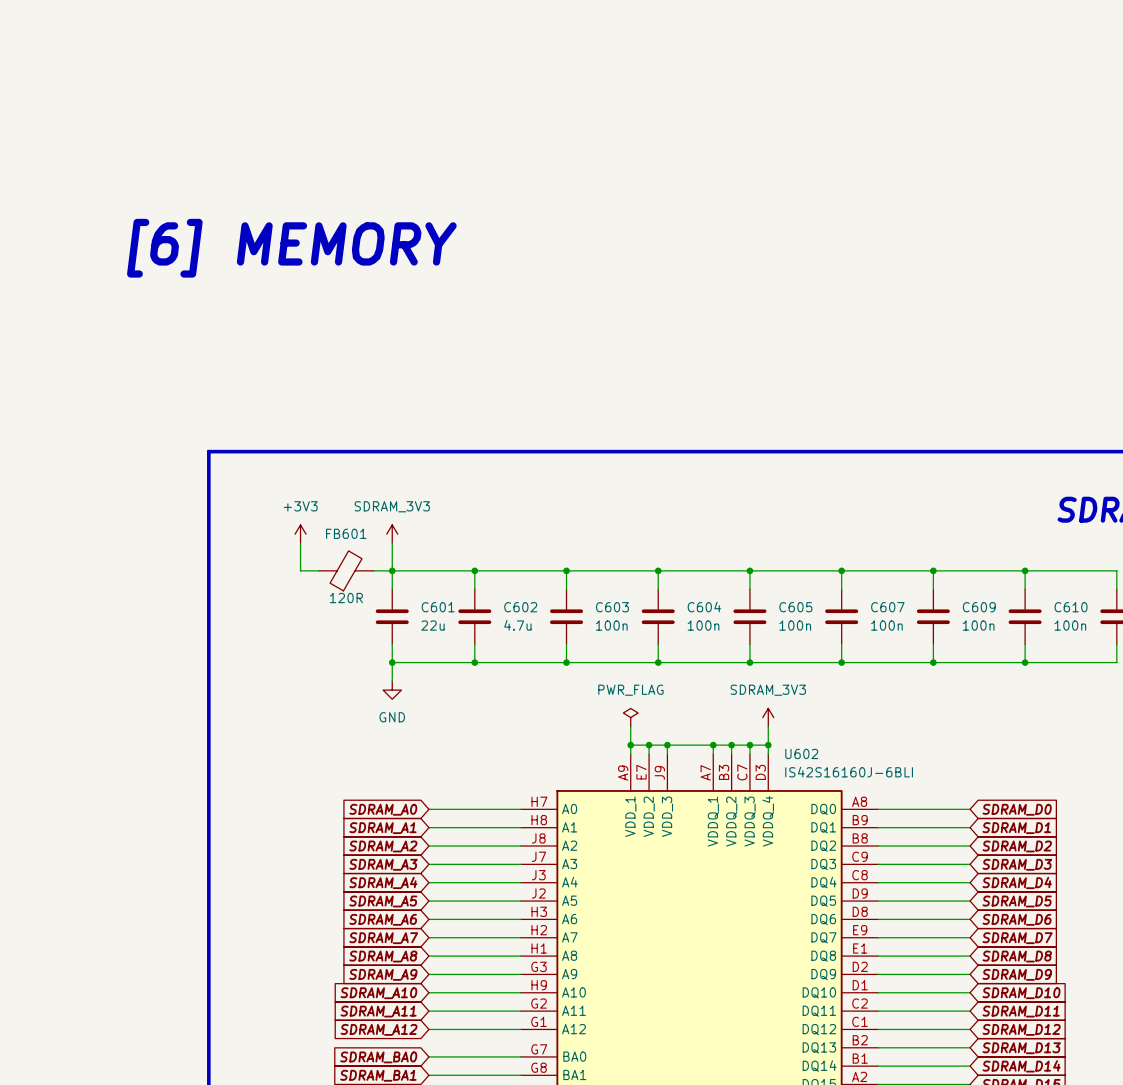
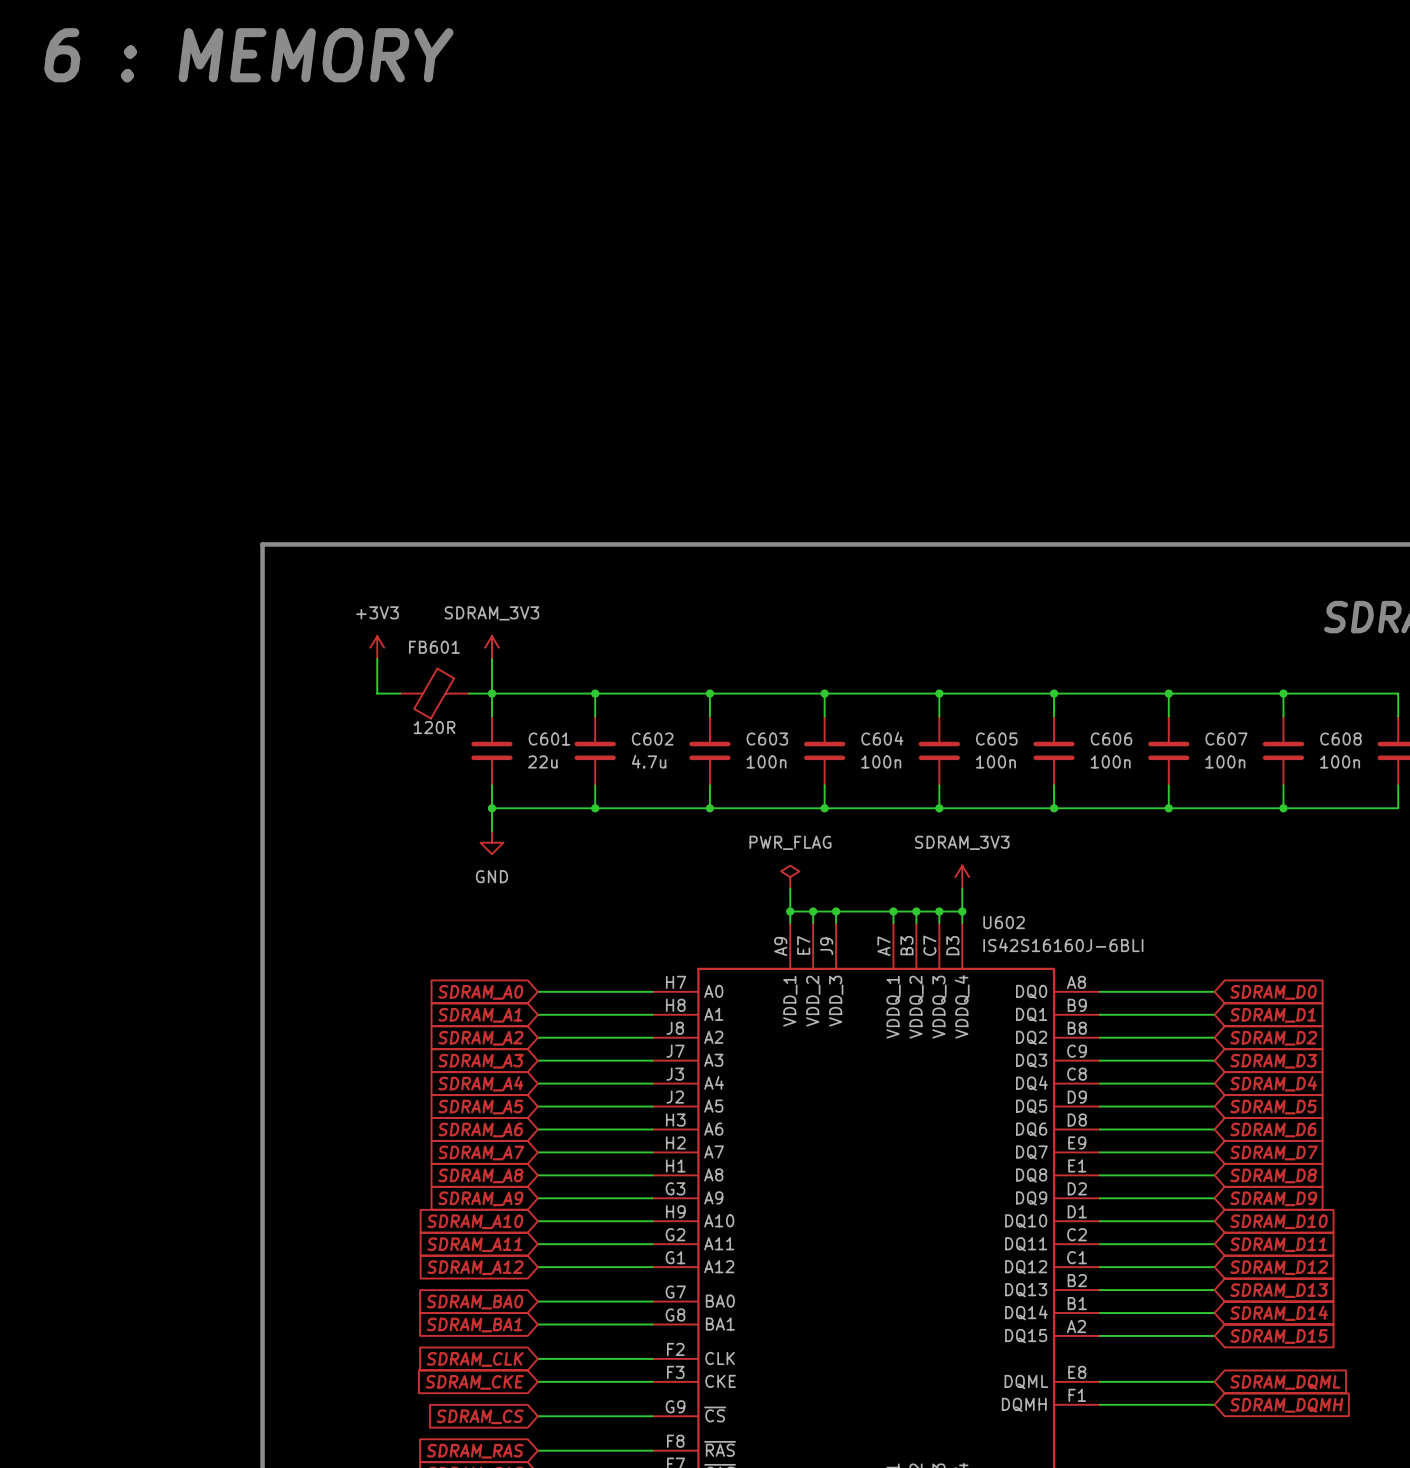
text: none -> 6 : MEMORY (248, 55)
text: [6] MEMORY (291, 248) -> none
C607 name: C607 (887, 607) -> C606 (1111, 739)
C609 name: C609 (979, 607) -> C607 (1226, 739)
C610 name: C610 (1071, 607) -> C608 (1340, 739)

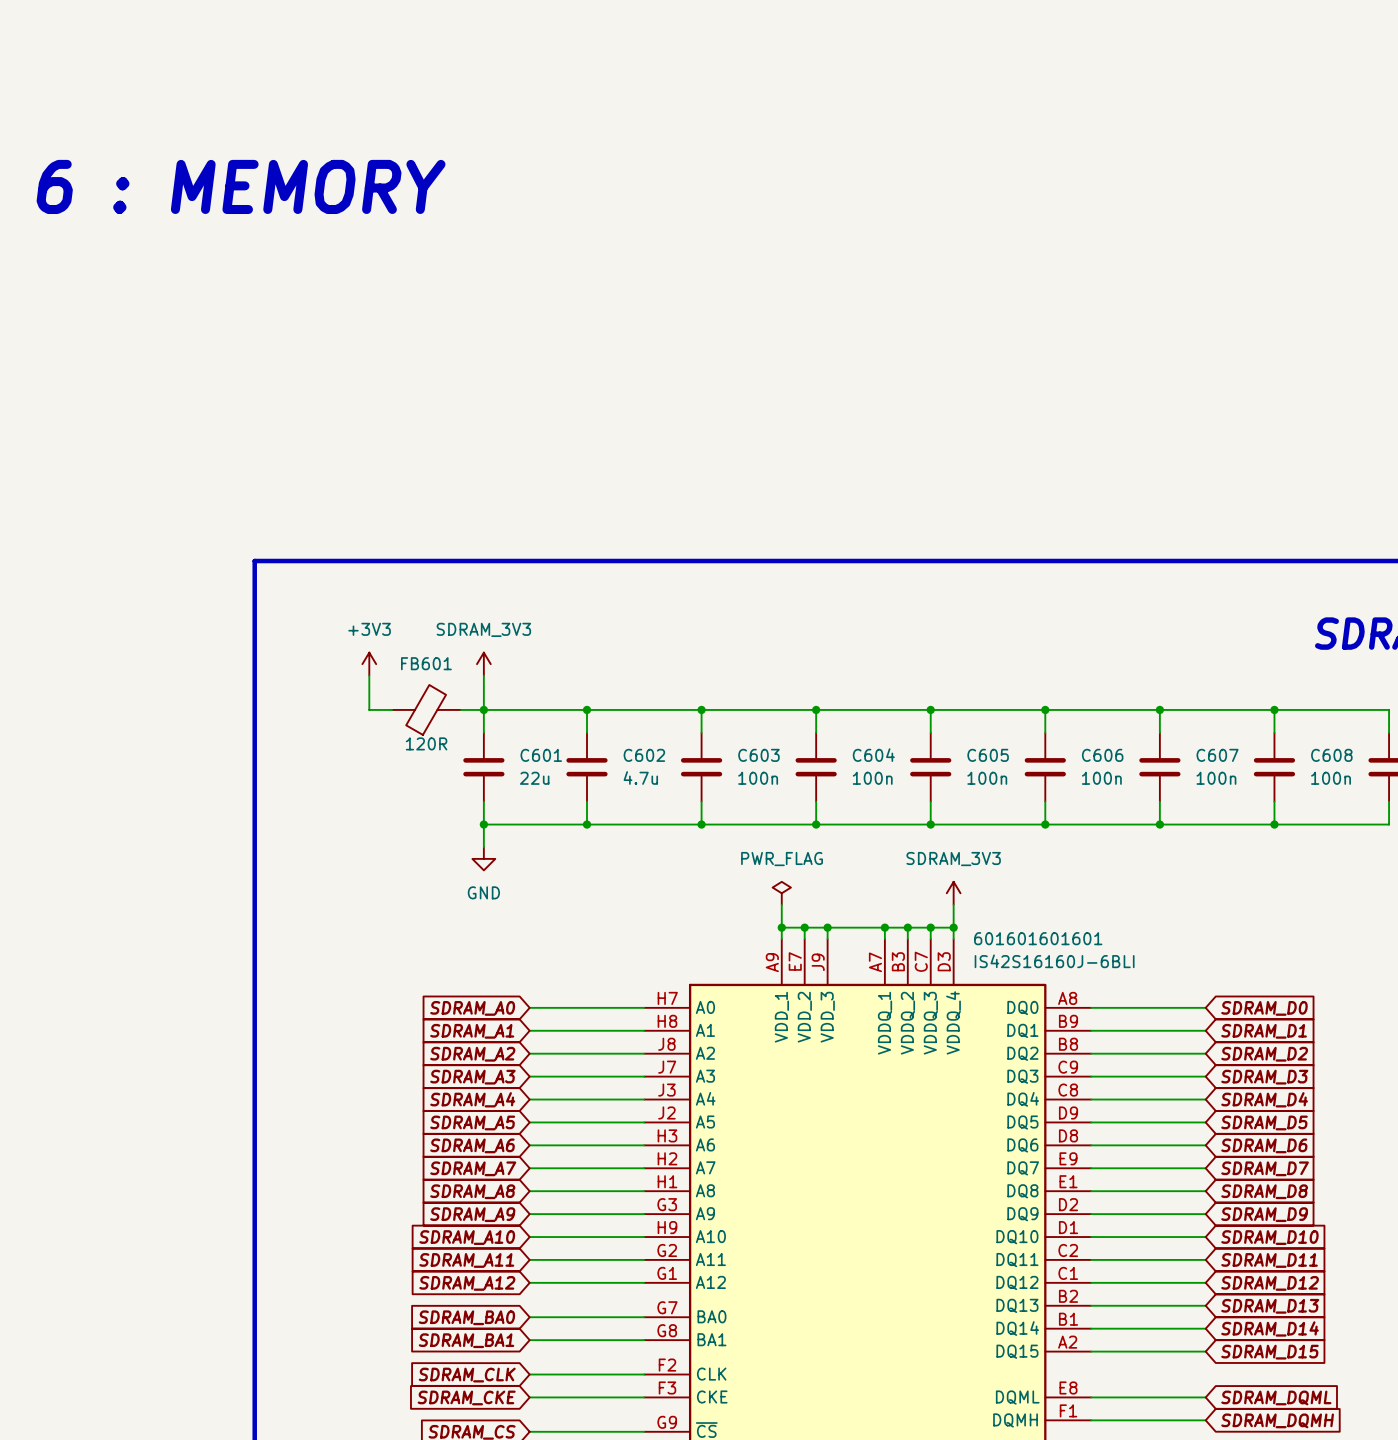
text position: 6 : MEMORY (248, 55) -> 6 : MEMORY (241, 186)
U602 name: U602 (1004, 922) -> 601601601601 (1038, 938)

